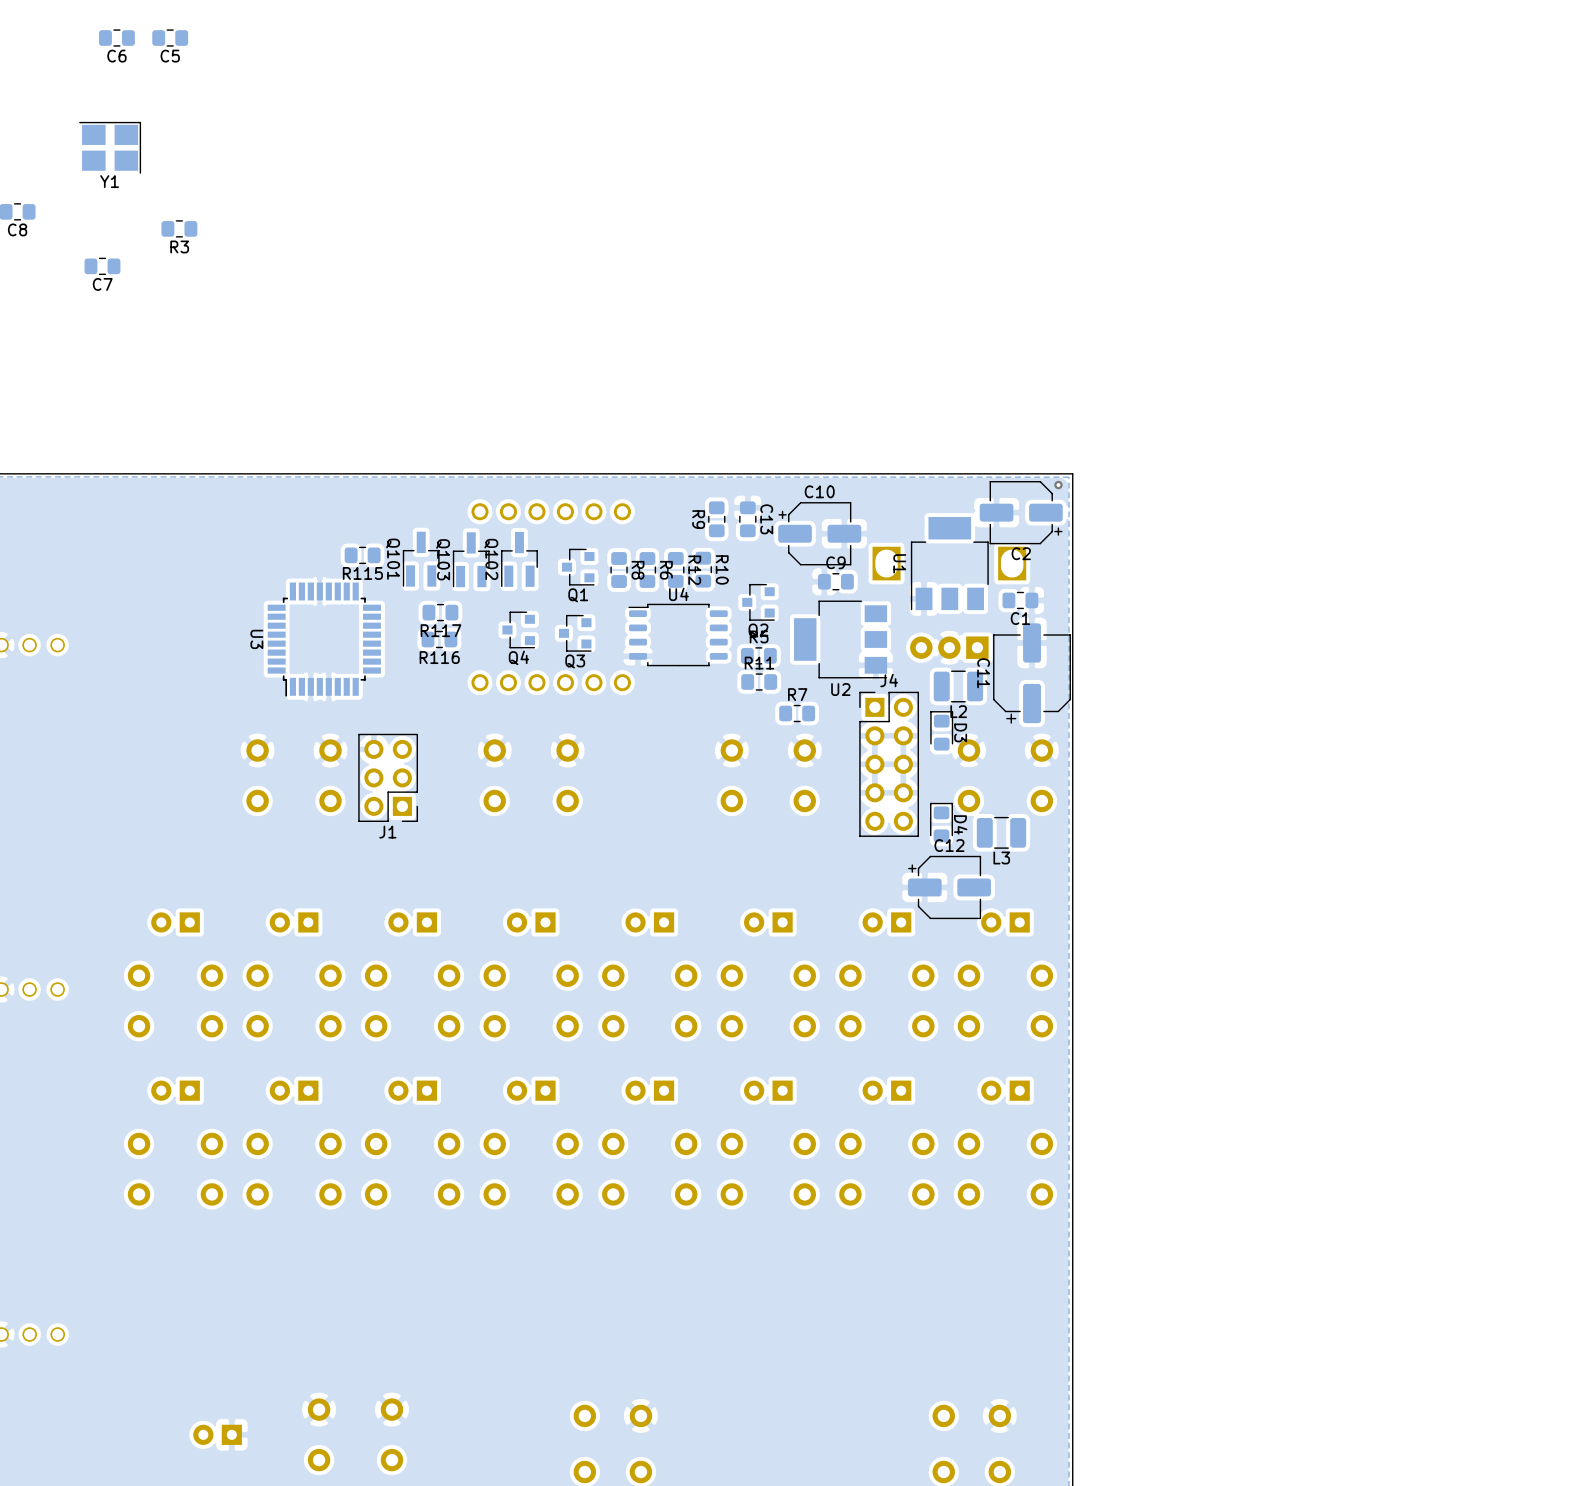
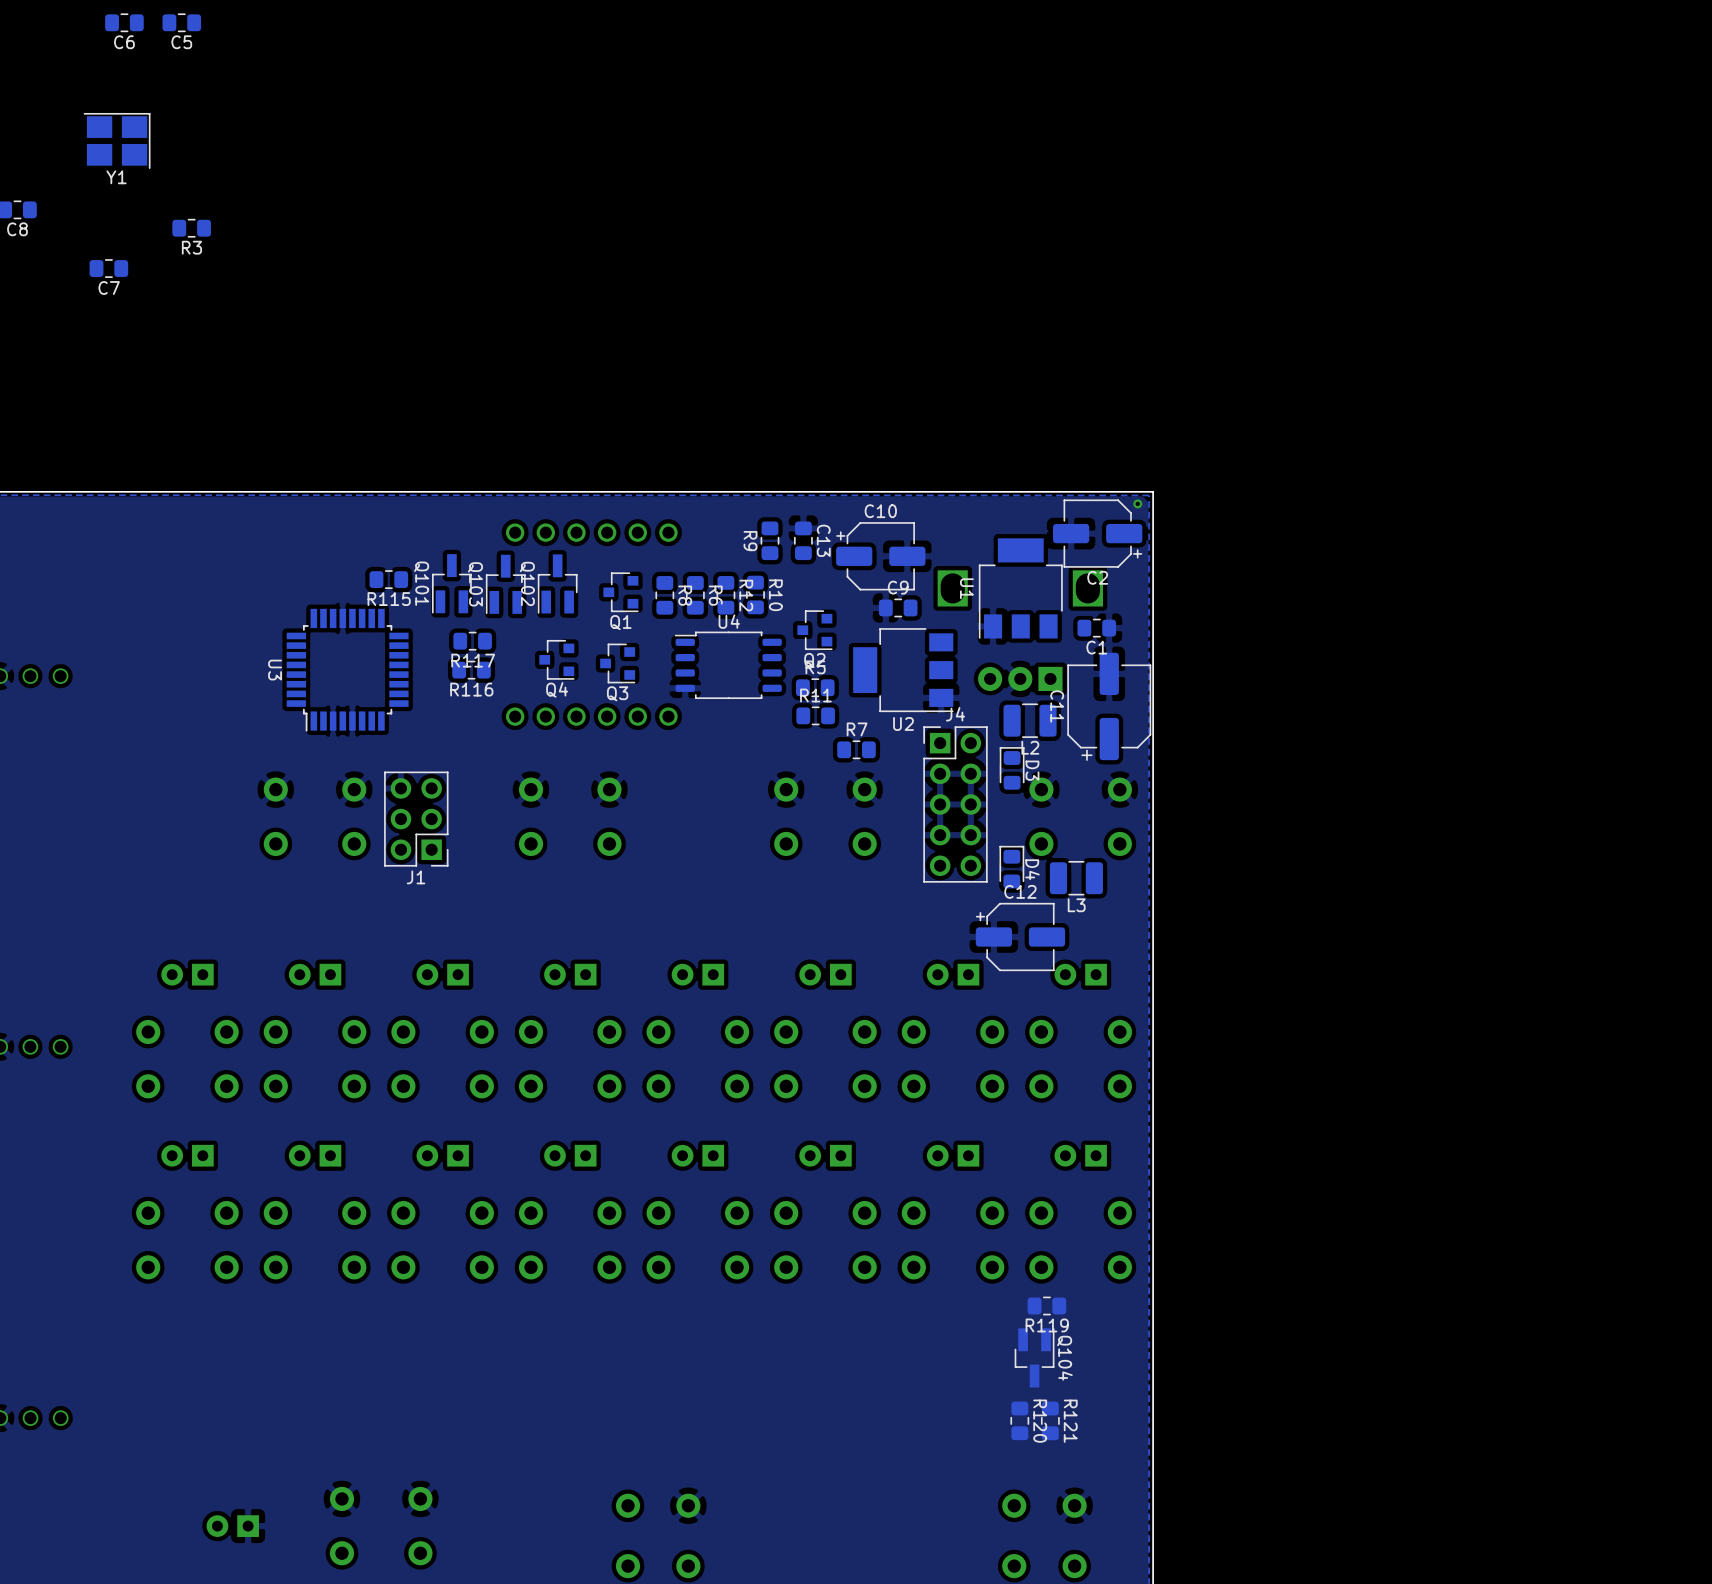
R119: none -> (1046, 1305)
Q104: none -> (1034, 1357)
R120: none -> (1019, 1420)
R121: none -> (1050, 1420)

